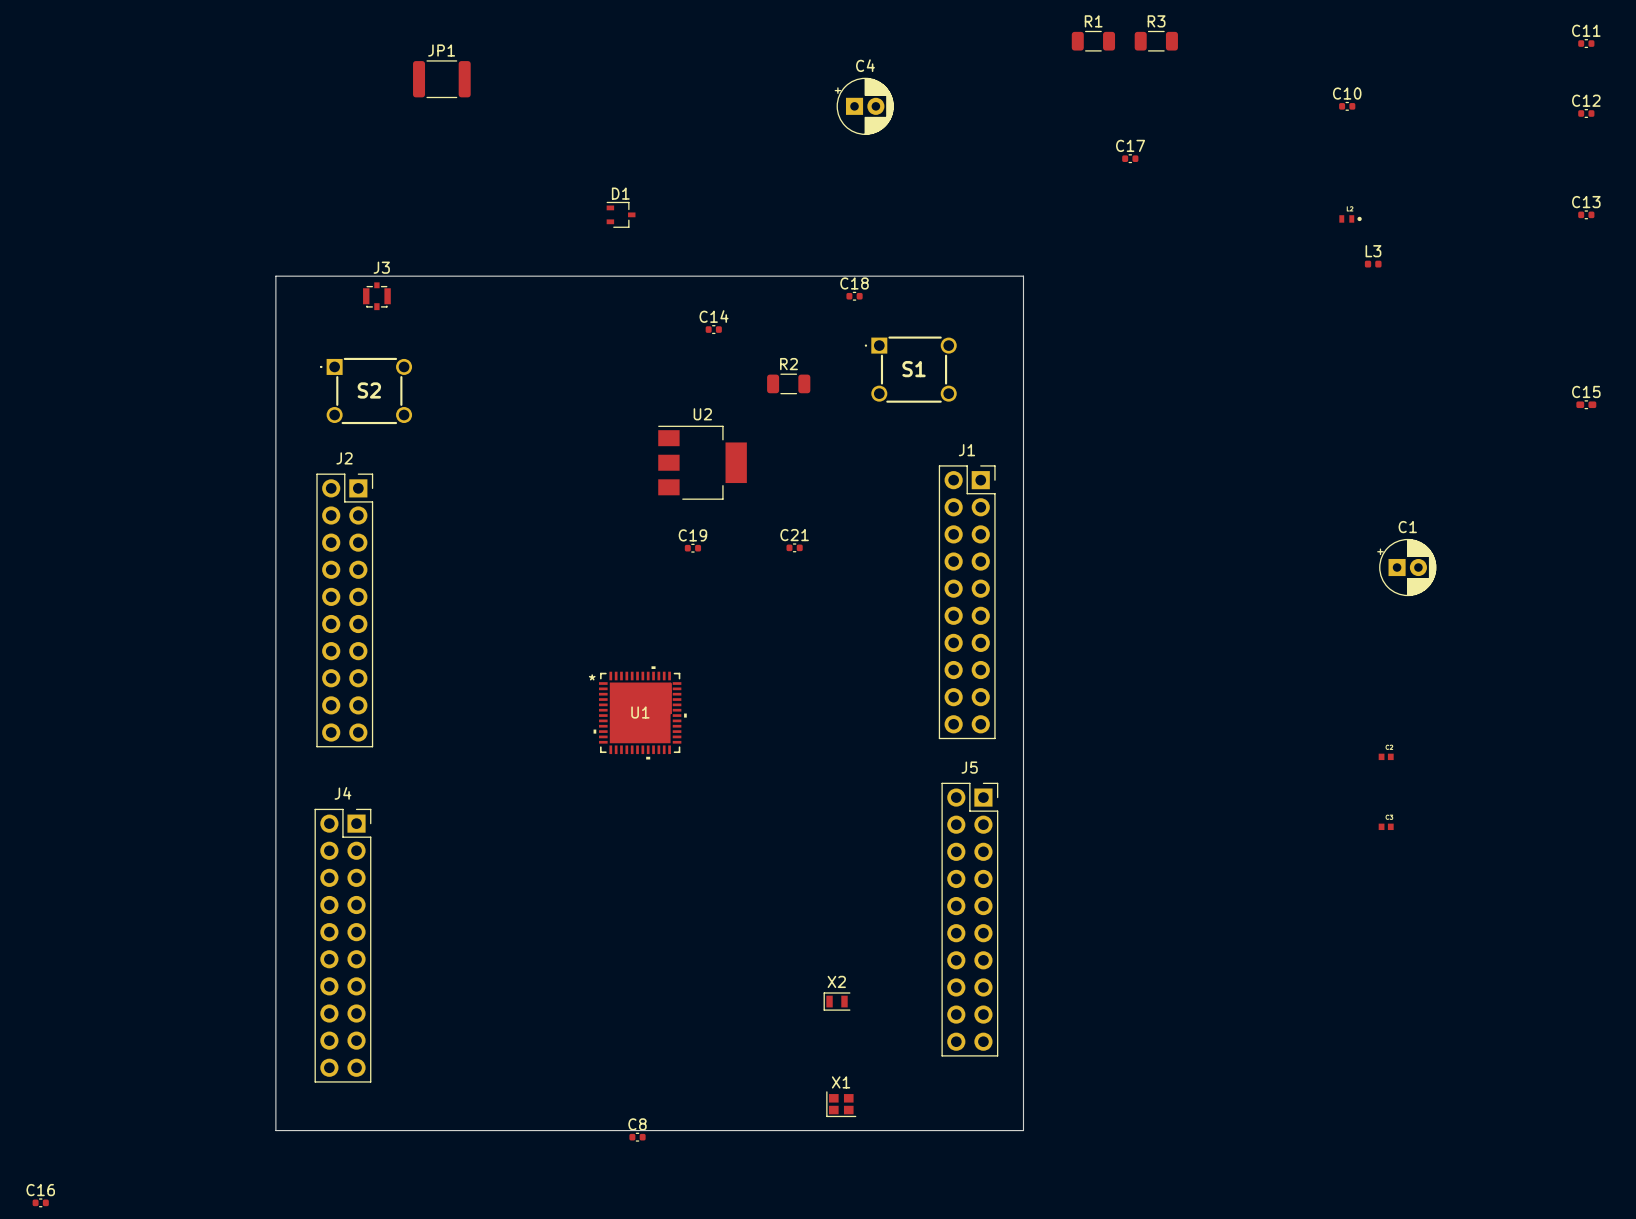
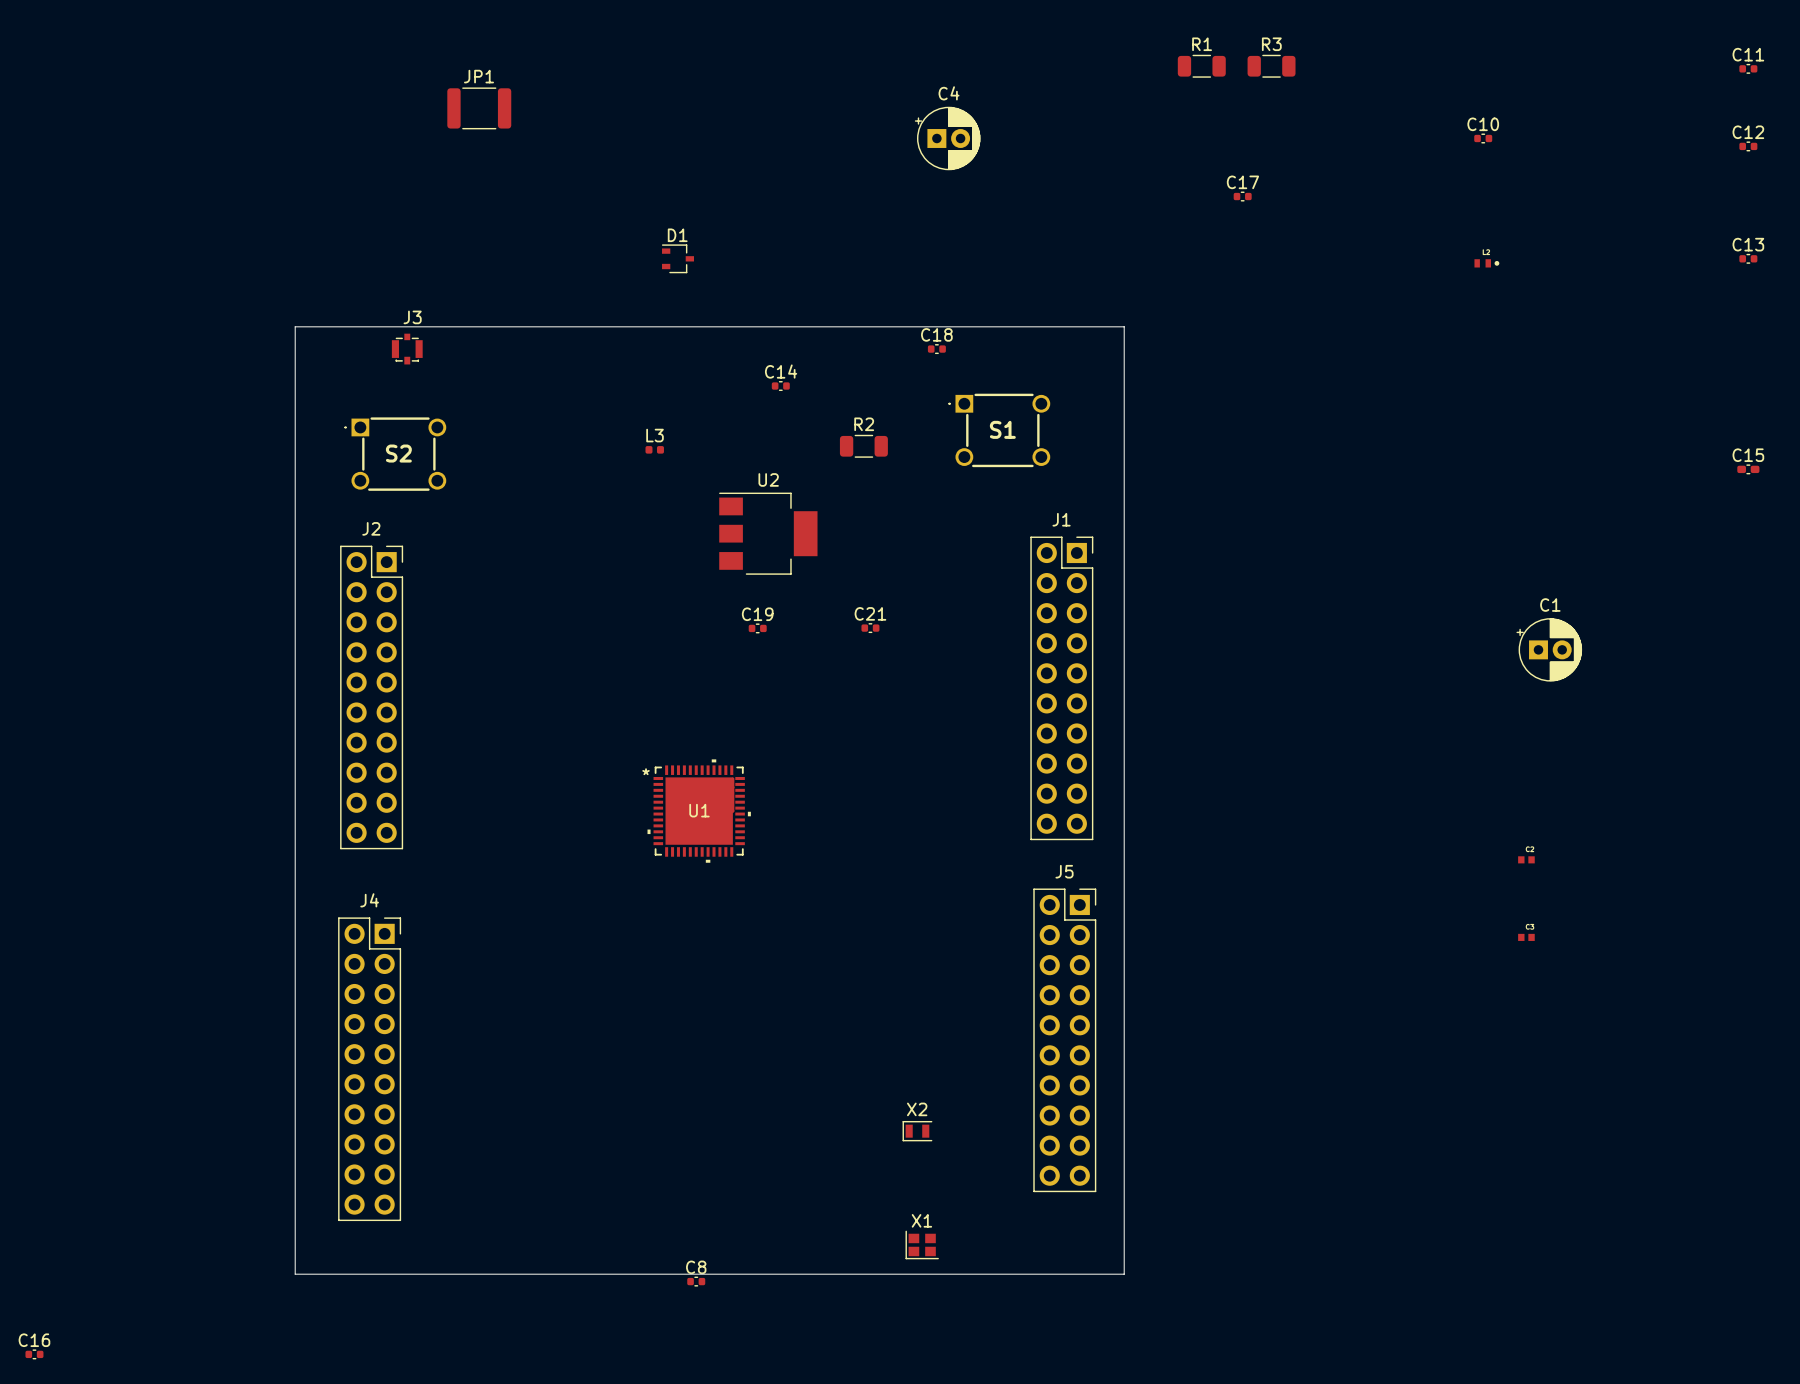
L3 position: (1373, 264) -> (654, 449)

